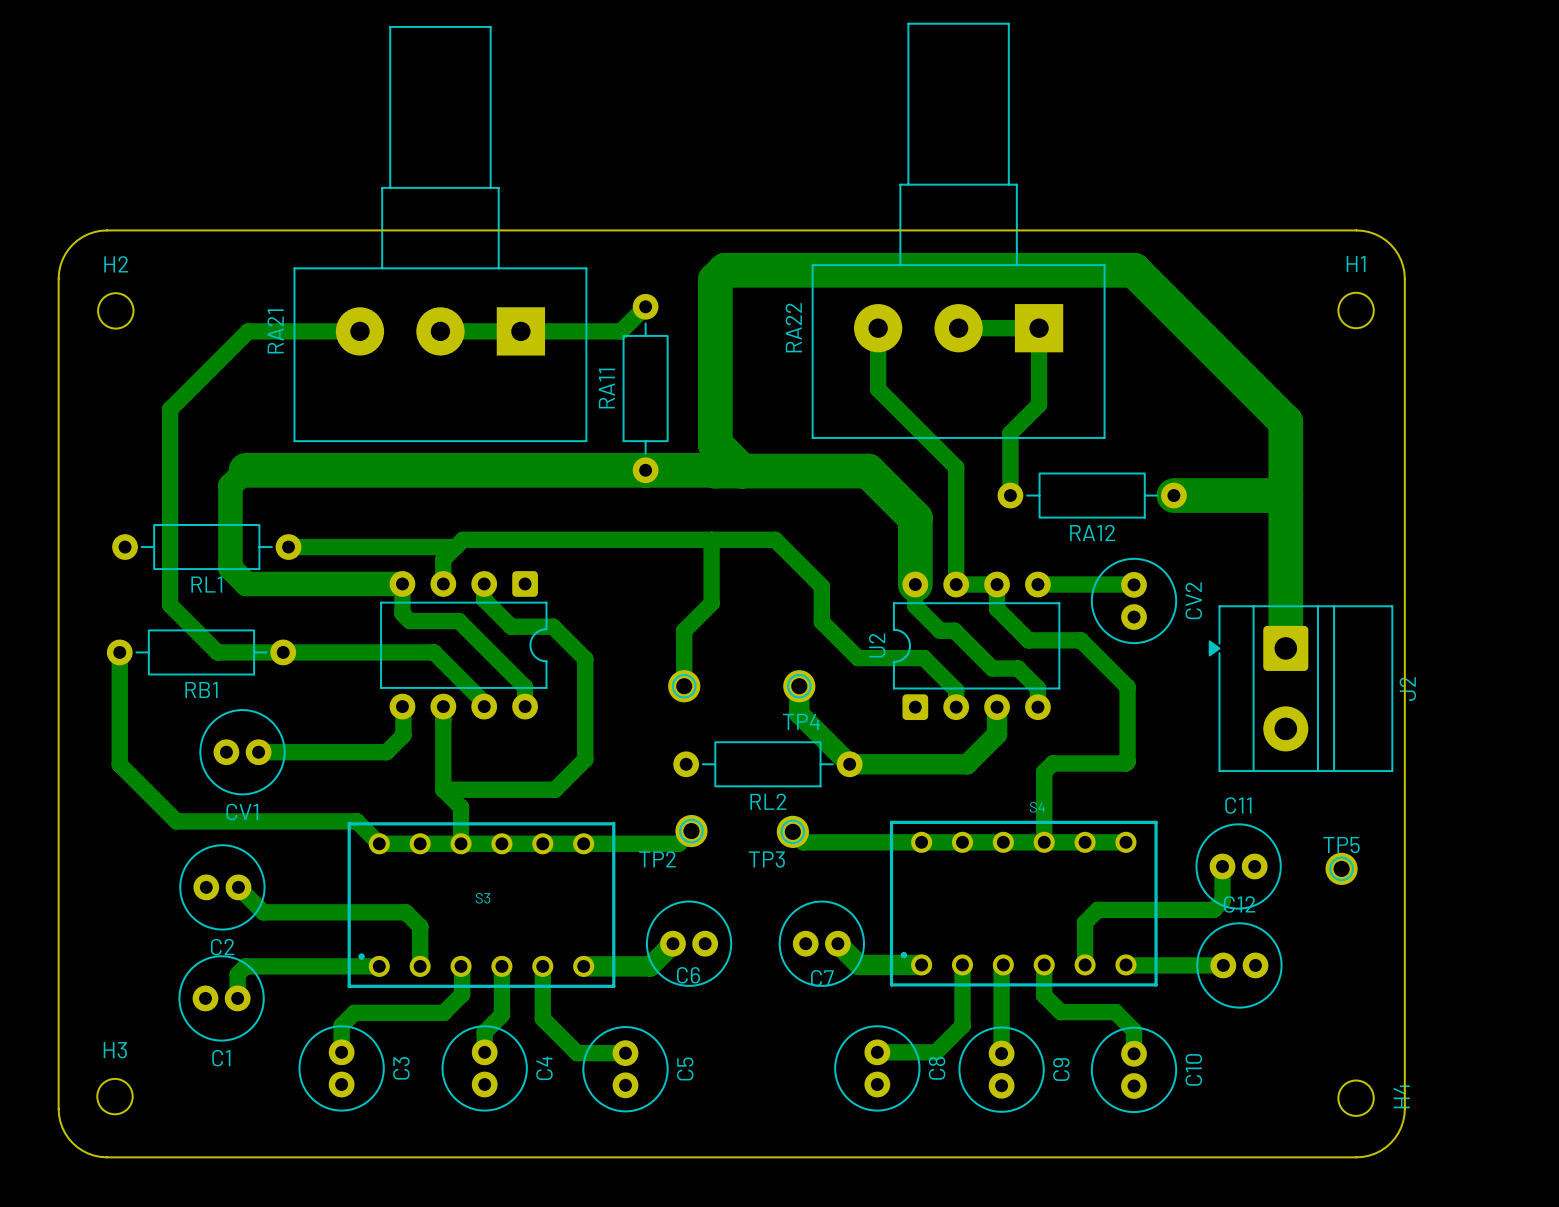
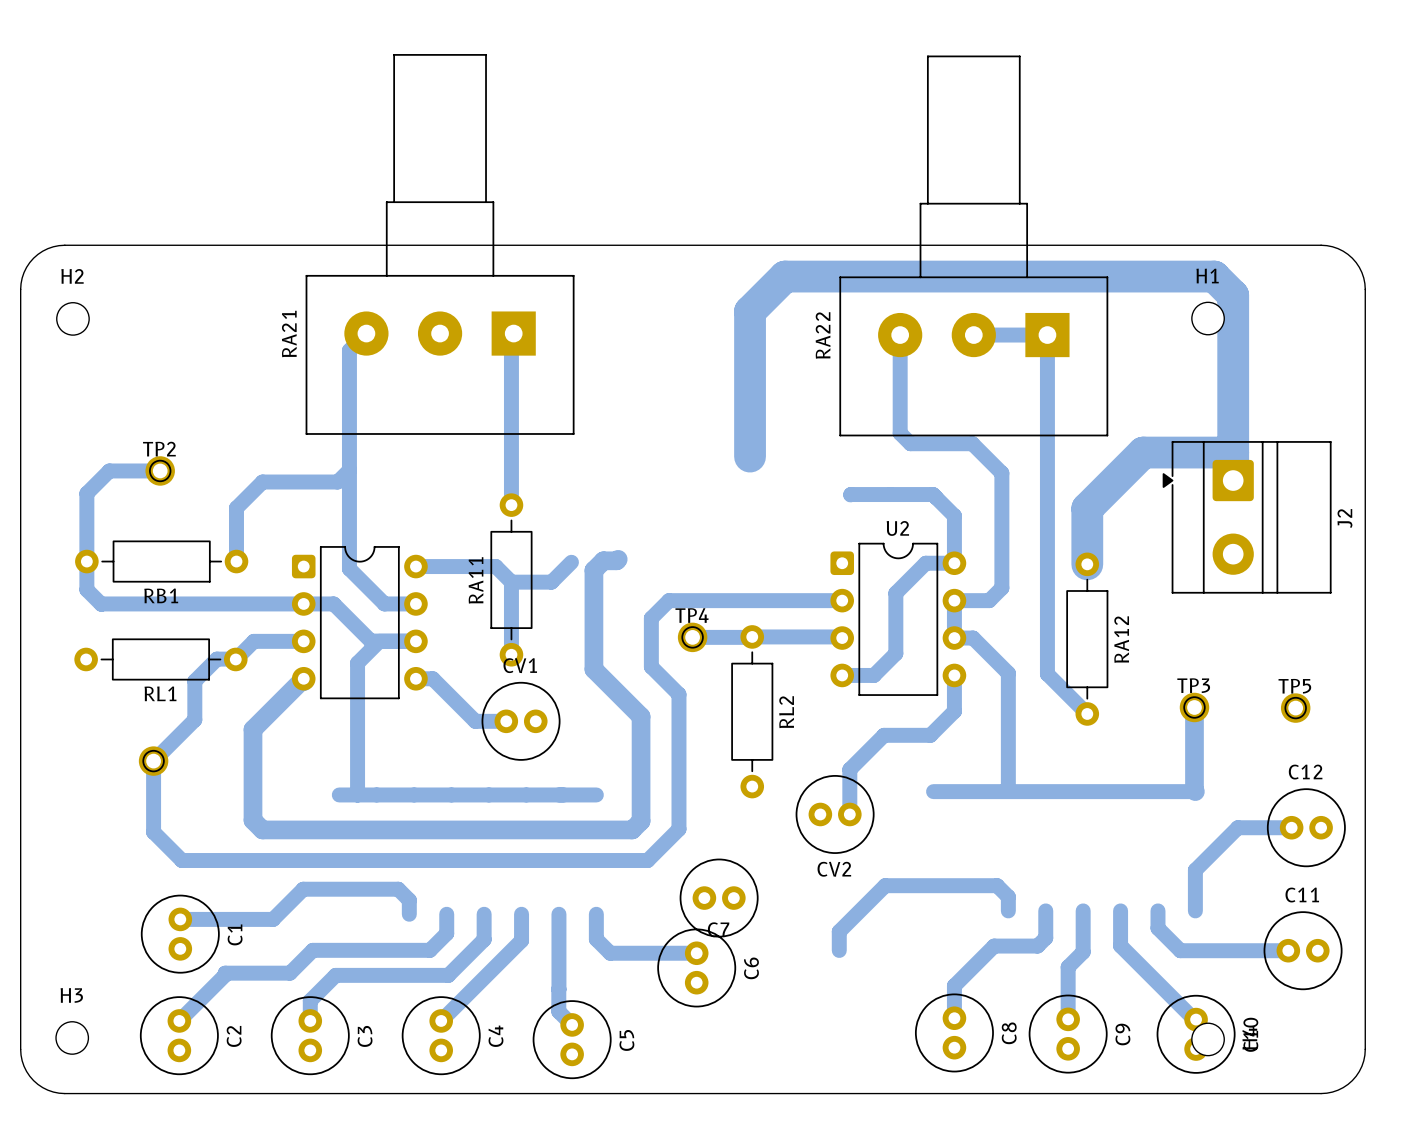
RA22 position: (958, 230) -> (973, 245)
board edge: (1356, 230) (1375, 234) (1390, 244) (1401, 260) (1404, 278) (1404, 1109) (1401, 1127) (1390, 1143) (1375, 1153) (1356, 1157) -> (1208, 245) (1332, 246) (1343, 251) (1356, 262) (1361, 272) (1364, 283) (1365, 1049) (1363, 1060) (1356, 1076) (1343, 1087) (1332, 1092) (1208, 1093)
RA21 position: (440, 234) -> (440, 244)
bottom track: (645, 306) (621, 331) (440, 331) -> none
bottom track: none -> (366, 333) (349, 350) (349, 568) (384, 603) (415, 603)
bottom track: (878, 328) (878, 389) (956, 467) (956, 584) (997, 584) (997, 608) (1028, 640) (1080, 640) (1127, 687) (1127, 761) (1125, 763) (1052, 763) (1044, 772) (1044, 842) -> none
bottom track: (958, 328) (1039, 328) (1039, 404) (1010, 433) (1010, 495) -> none
bottom track: none -> (900, 335) (900, 433) (910, 443) (972, 443) (1001, 473) (1001, 588) (989, 600) (954, 600) (954, 638) (973, 638) (1008, 673) (1008, 791)
bottom track: none -> (973, 335) (1047, 335) (1047, 674) (1087, 713)
bottom track: none -> (511, 335) (511, 505)
bottom track: (359, 331) (248, 331) (170, 409) (170, 604) (217, 652) (434, 652) (484, 702) (484, 706) -> none
RA11 position: (645, 388) -> (511, 579)
bottom track: none -> (1233, 452) (1143, 452) (1087, 508) (1087, 564)
bottom track: none -> (751, 458) (750, 311) (785, 276) (1214, 276) (1233, 295) (1233, 480)
bottom track: (742, 471) (715, 444) (715, 280) (725, 270) (1134, 270) (1285, 422) (1285, 648) -> none
bottom track: none -> (349, 470) (337, 482) (262, 482) (236, 508) (236, 561)
bottom track: none -> (160, 470) (109, 470) (86, 493) (86, 589) (101, 604) (333, 603) (370, 641) (415, 641) (379, 641) (357, 663) (357, 794)
bottom track: (1285, 494) (1173, 495) -> none
RA12 rotation: 0° (1092, 495) -> 90° clockwise (1087, 639)
RA12 position: (1092, 495) -> (1087, 639)
bottom track: none -> (850, 494) (933, 494) (954, 515) (954, 563) (925, 563) (895, 593) (895, 653) (873, 675) (842, 675)
RA12 name position: RA12 (1092, 532) -> RA12 (1121, 639)
bottom track: (711, 539) (711, 603) (684, 630) (684, 686) -> none
RL1 position: (206, 547) -> (160, 659)
bottom track: (288, 547) (455, 547) -> none
bottom track: none -> (618, 559) (603, 560) (593, 570) (593, 669) (641, 716) (641, 821) (632, 829) (262, 829) (252, 820) (252, 729) (303, 678) (303, 681)
bottom track: none -> (571, 562) (551, 582) (511, 582)
bottom track: none -> (415, 566) (495, 566) (511, 582)
bottom track: (443, 583) (443, 559) (462, 539) (775, 539) (821, 586) (821, 621) (858, 658) (924, 658) (956, 690) (956, 707) -> none
bottom track: (484, 583) (484, 599) (511, 626) (553, 626) (585, 658) (585, 759) (555, 789) (443, 789) -> none
bottom track: (1037, 584) (1134, 584) -> none
bottom track: none -> (511, 582) (511, 654)
CV2 rotation: 0° (1134, 600) -> 90° clockwise (835, 814)
CV2 position: (1134, 600) -> (835, 814)
bottom track: none -> (842, 600) (669, 600) (651, 618) (651, 666) (678, 694) (678, 829) (647, 860) (181, 860) (153, 832) (153, 761) (194, 719) (194, 681) (216, 659) (235, 659) (253, 641) (303, 641)
part rotation: 0° (463, 645) -> 90° counterclockwise (359, 622)
U2 rotation: 0° (976, 645) -> 90° clockwise (898, 619)
bottom track: (119, 652) (119, 764) (176, 821) (356, 821) (379, 843) (678, 843) (691, 831) -> none
RB1 position: (201, 652) -> (161, 561)
bottom track: none -> (692, 637) (842, 638)
part: (684, 686) -> none
bottom track: (799, 686) (799, 713) (849, 764) (967, 764) (997, 734) (997, 707) -> none
TP4 position: (799, 686) -> (692, 637)
J2 position: (1301, 688) -> (1247, 517)
bottom track: none -> (954, 675) (954, 711) (930, 735) (884, 735) (849, 769) (849, 814)
bottom track: none -> (415, 678) (432, 678) (475, 721) (506, 721)
bottom track: (402, 706) (403, 735) (386, 752) (258, 752) -> none
bottom track: (443, 706) (443, 789) -> none
bottom track: (525, 706) (525, 687) (458, 621) (409, 621) (402, 613) (402, 583) (246, 583) (230, 567) (230, 485) (246, 470) (868, 471) (915, 518) (915, 605) (940, 630) (954, 630) (992, 668) (1018, 668) (1037, 688) (1037, 707) -> none
TP4 name position: TP4 (801, 721) -> TP4 (692, 615)
bottom track: none -> (1194, 707) (1195, 791)
CV1 position: (242, 752) -> (521, 721)
RL2 rotation: 0° (767, 764) -> 90° clockwise (752, 711)
bottom track: (443, 789) (461, 807) (461, 843) -> none
part: none -> (153, 761)
RL2 name position: RL2 (768, 801) -> RL2 (786, 712)
CV1 name position: CV1 (242, 811) -> CV1 (520, 665)
bottom track: none -> (933, 791) (1195, 791)
bottom track: none -> (339, 794) (596, 794)
TP2 position: (691, 831) -> (160, 470)
bottom track: (792, 831) (803, 842) (1125, 842) -> none
TP3 position: (792, 831) -> (1194, 707)
TP2 name position: TP2 (657, 859) -> TP2 (159, 449)
TP3 name position: TP3 (766, 859) -> TP3 (1193, 685)
bottom track: (1222, 866) (1222, 901) (1213, 909) (1097, 909) (1084, 922) -> none
C11 position: (1238, 866) -> (1303, 950)
bottom track: none -> (1291, 827) (1237, 827) (1195, 870) (1195, 910)
TP5 position: (1341, 868) -> (1295, 708)
C2 rotation: 0° (222, 887) -> 90° clockwise (179, 1035)
C2 position: (222, 887) -> (179, 1035)
bottom track: (238, 887) (263, 912) (405, 912) (420, 926) -> none
S4: (1023, 903) -> none
S3: (481, 905) -> none
bottom track: (1085, 922) (1085, 964) -> none
bottom track: (420, 926) (420, 966) -> none
bottom track: (672, 943) (650, 966) (583, 966) -> none
C6 rotation: 0° (689, 943) -> 90° clockwise (696, 967)
C6 position: (689, 943) -> (696, 967)
bottom track: (837, 943) (859, 964) (921, 964) -> none
C2 name position: C2 (222, 947) -> C2 (234, 1036)
bottom track: none -> (1008, 910) (1008, 896) (997, 885) (885, 885) (839, 931) (839, 950)
bottom track: none -> (1045, 910) (1045, 937) (1037, 946) (994, 946) (954, 985) (954, 1018)
bottom track: none -> (1083, 910) (1083, 952) (1068, 967) (1068, 1019)
bottom track: none -> (1120, 910) (1120, 945) (1196, 1019)
bottom track: none -> (1157, 910) (1157, 928) (1180, 950) (1288, 950)
bottom track: none -> (409, 914) (409, 900) (398, 889) (303, 889) (273, 919) (180, 919)
bottom track: none -> (446, 914) (446, 933) (429, 950) (312, 950) (290, 973) (225, 973) (179, 1020)
bottom track: none -> (484, 914) (484, 939) (448, 975) (335, 975) (310, 1000) (310, 1020)
bottom track: none -> (521, 914) (521, 940) (441, 1020)
bottom track: none -> (558, 914) (558, 989)
bottom track: none -> (596, 914) (596, 939) (610, 953) (696, 953)
bottom track: (962, 964) (962, 1025) -> none
bottom track: (1003, 964) (1001, 966) (1001, 1053) -> none
bottom track: (1044, 964) (1044, 995) (1060, 1012) (1115, 1012) (1134, 1030) (1134, 1053) -> none
bottom track: (1125, 964) (1223, 965) -> none
C12 position: (1239, 965) -> (1306, 827)
bottom track: (379, 966) (245, 966) (237, 974) (237, 998) -> none
bottom track: (461, 966) (462, 994) (443, 1012) (354, 1012) (341, 1025) (341, 1052) -> none
bottom track: (501, 966) (501, 1015) (484, 1032) (484, 1052) -> none
bottom track: (542, 966) (542, 1018) (577, 1053) (625, 1053) -> none
C6 name position: C6 (688, 975) -> C6 (751, 968)
C1 rotation: 0° (221, 998) -> 90° clockwise (180, 934)
bottom track: (962, 1025) (936, 1052) (877, 1052) -> none
bottom track: none -> (558, 989) (558, 1011) (572, 1024)
C1 name position: C1 (221, 1058) -> C1 (235, 934)
C3 position: (341, 1068) -> (310, 1035)
C4 position: (484, 1068) -> (441, 1035)
C8 position: (877, 1068) -> (954, 1032)
C5 position: (625, 1069) -> (572, 1039)
C9 position: (1001, 1069) -> (1068, 1034)
C10 position: (1134, 1069) -> (1196, 1034)

